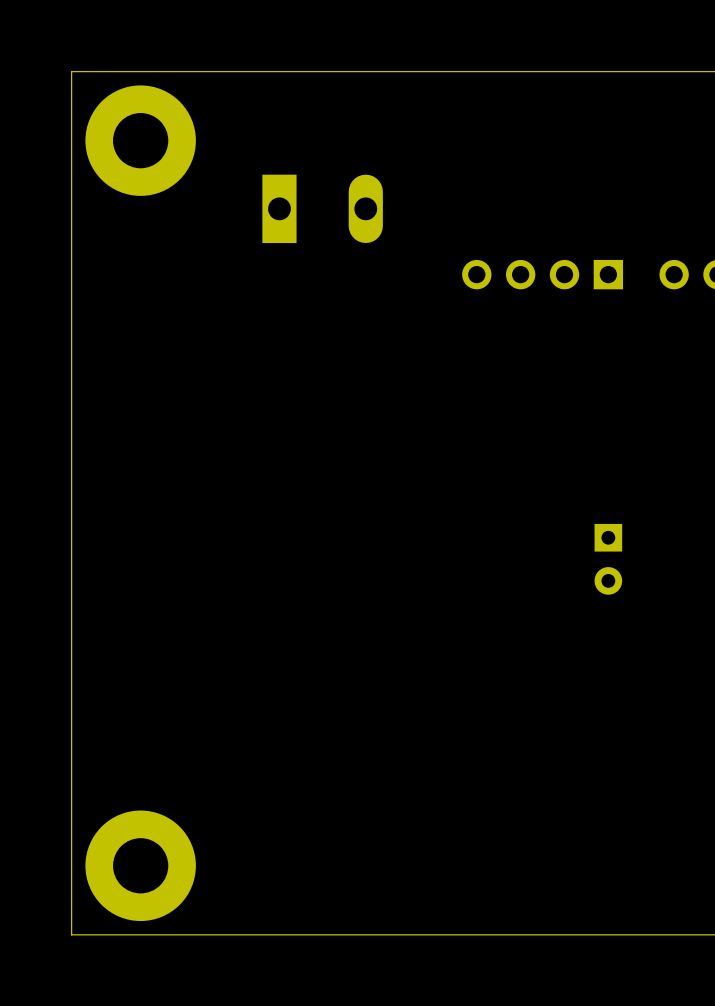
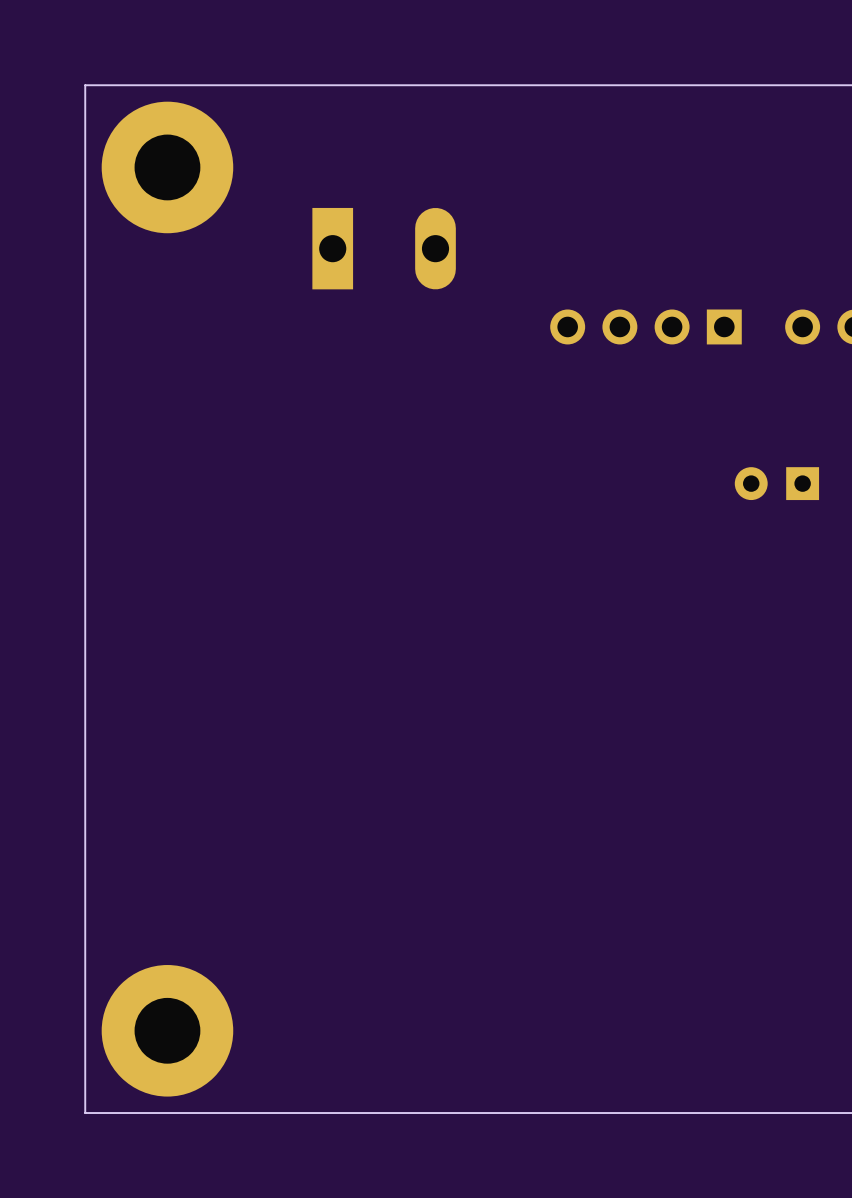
part rotation: 0° (608, 559) -> 90° clockwise (776, 483)
part position: (608, 559) -> (776, 483)

